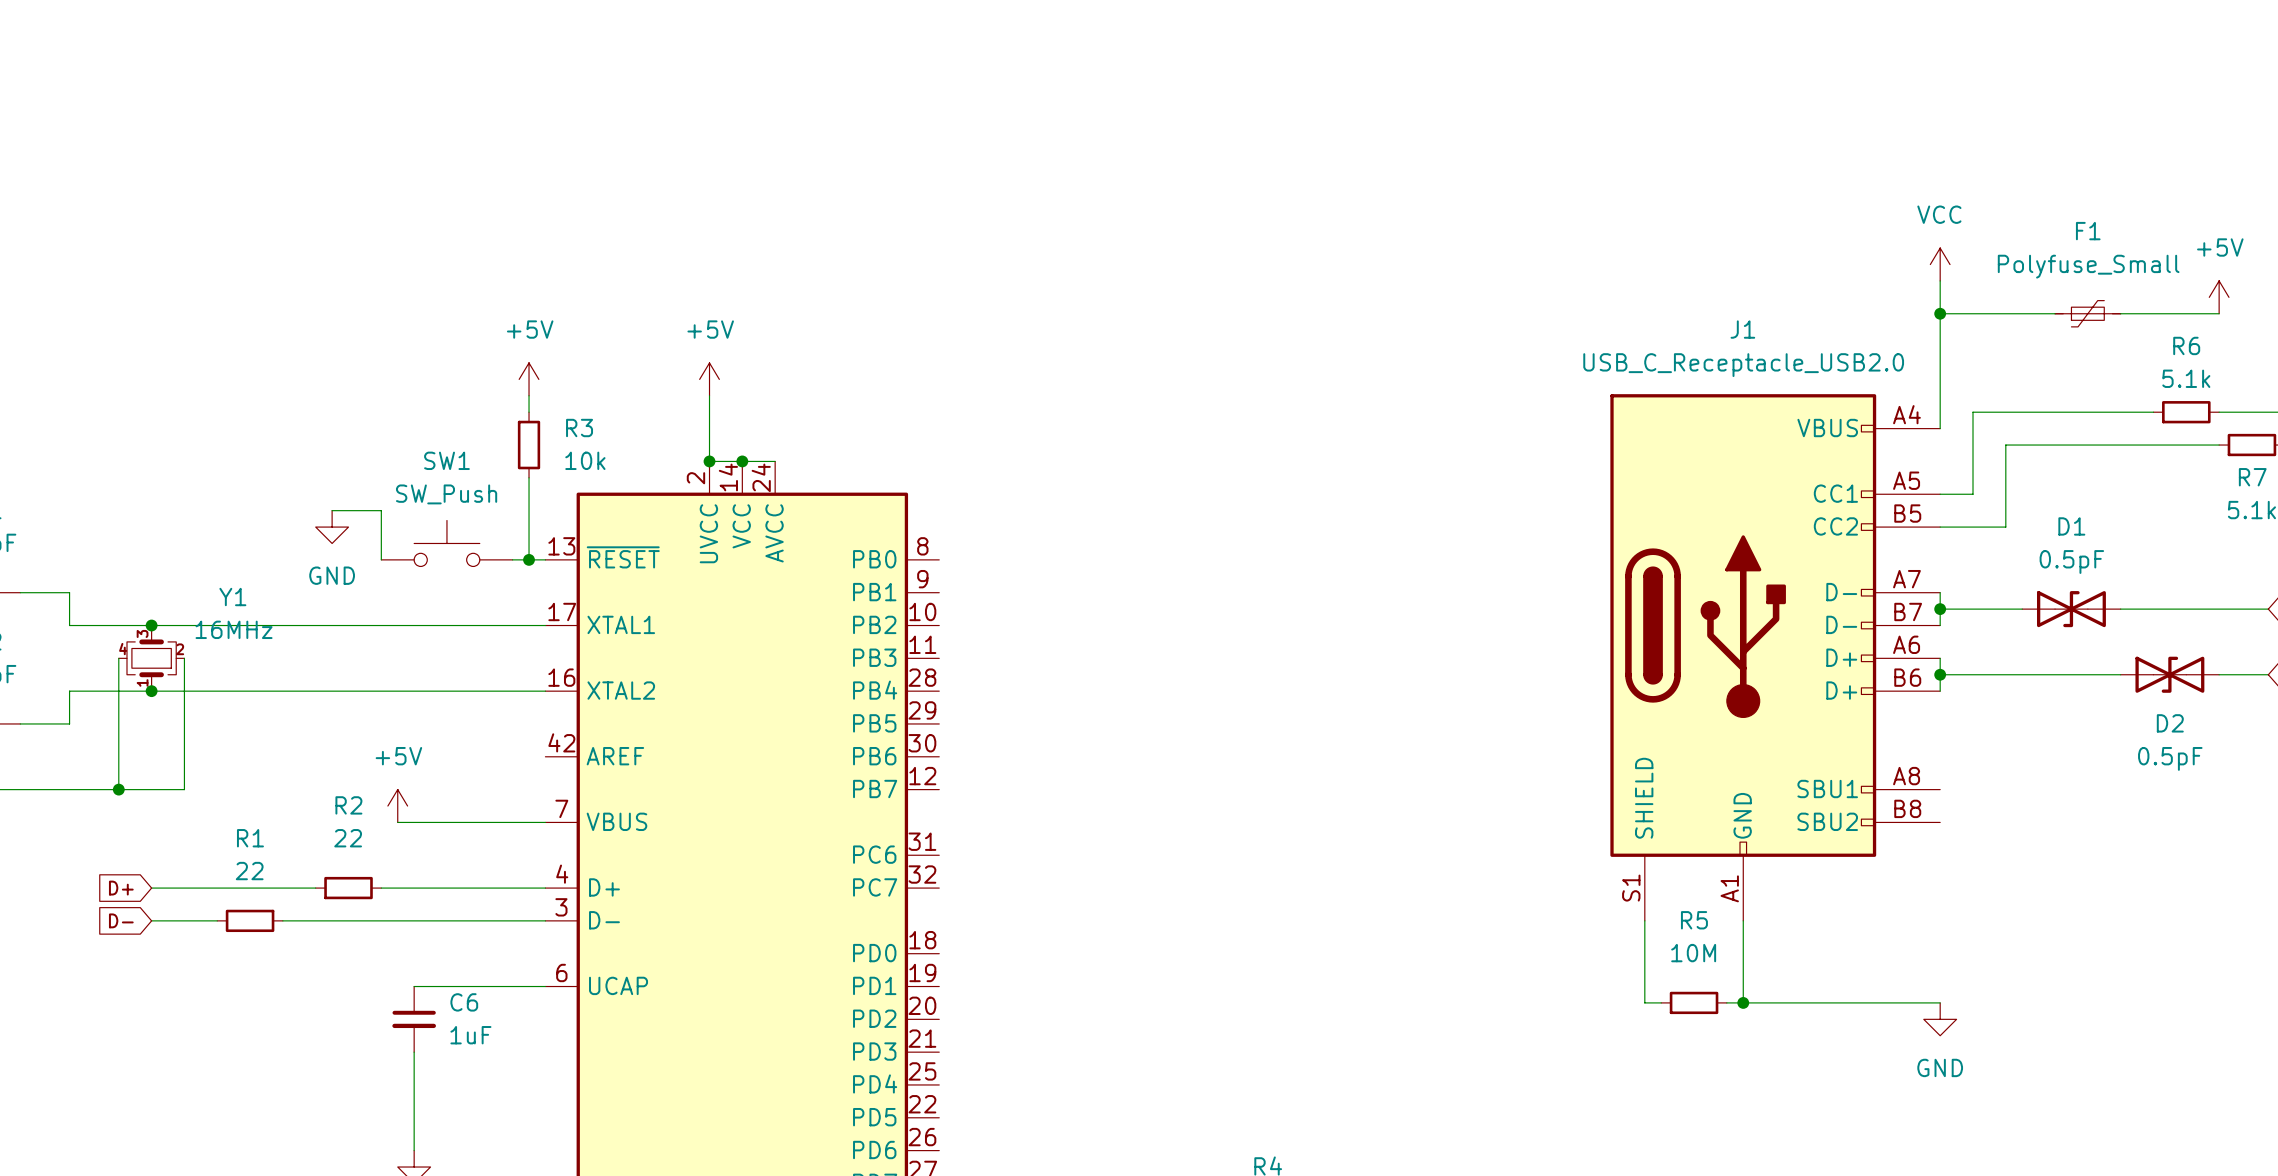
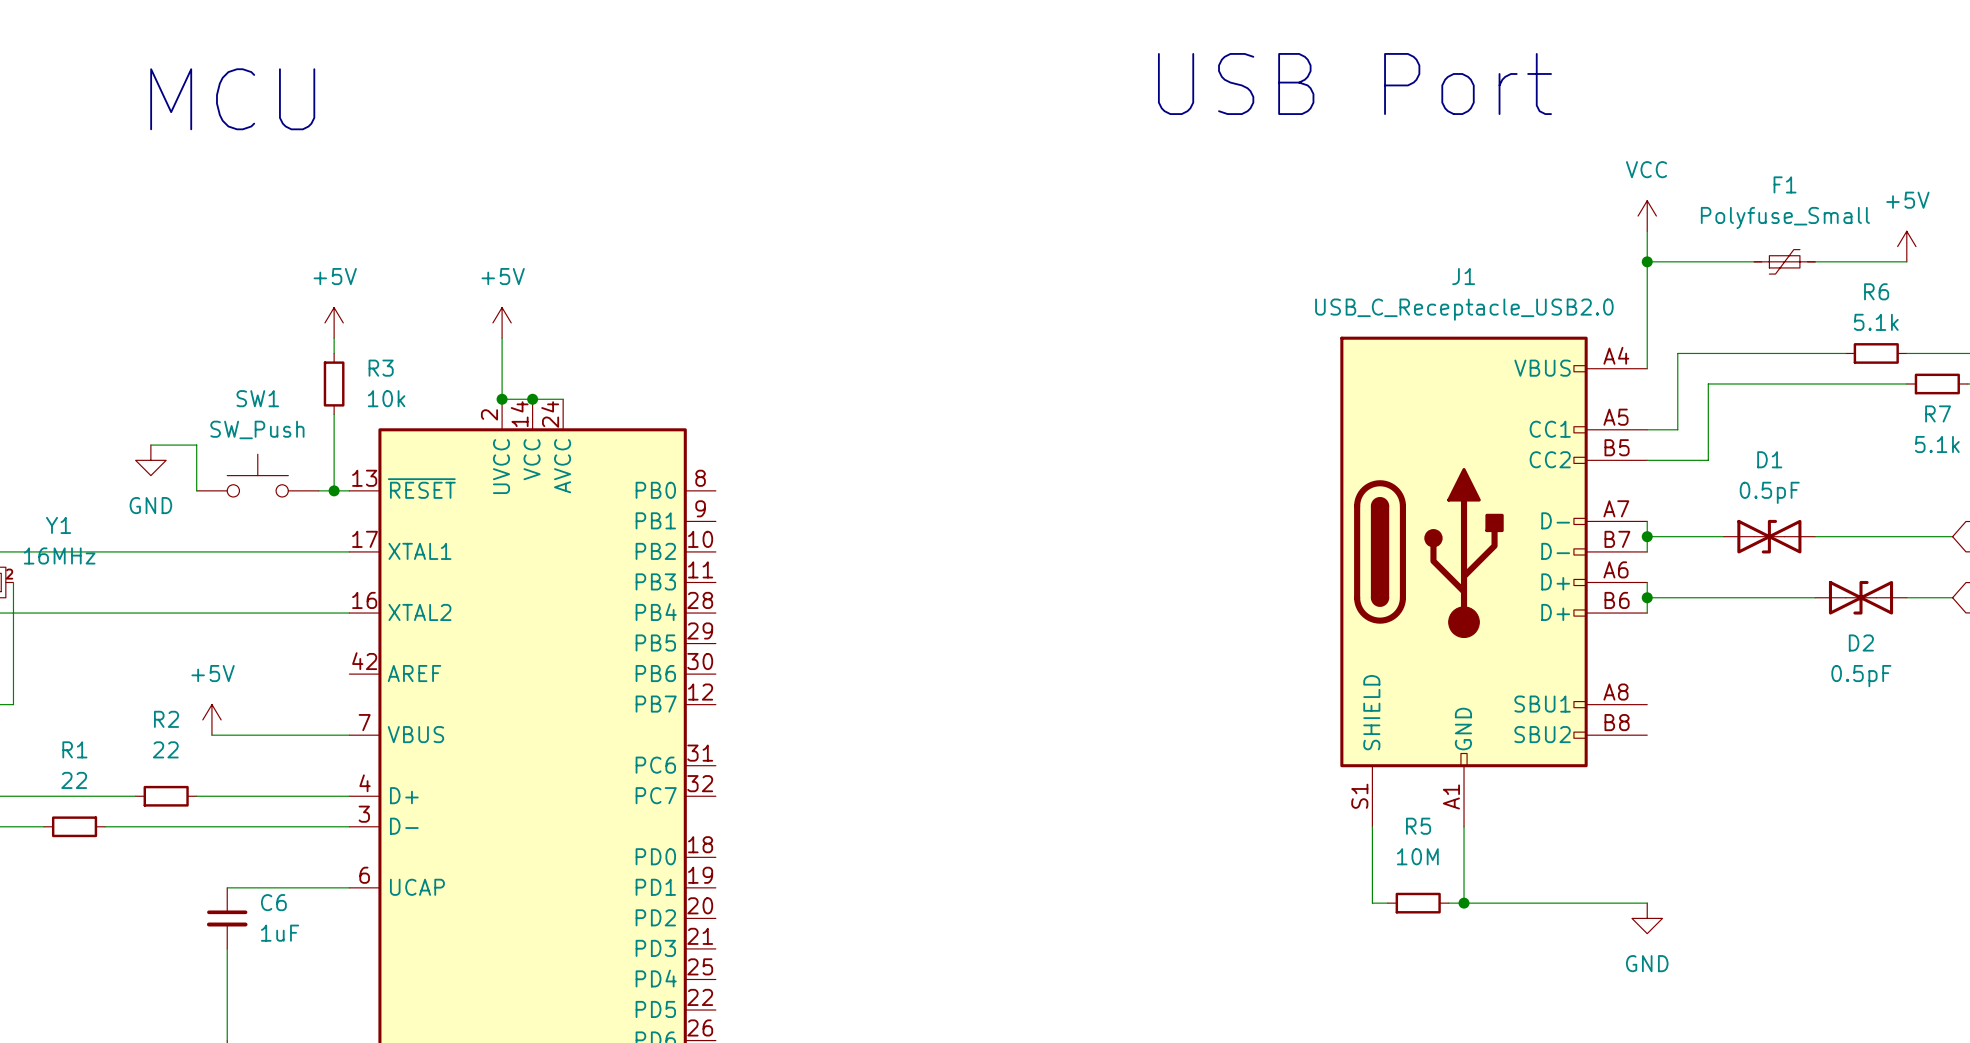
text: none -> USB Port (1354, 84)
text: none -> MCU (232, 99)

